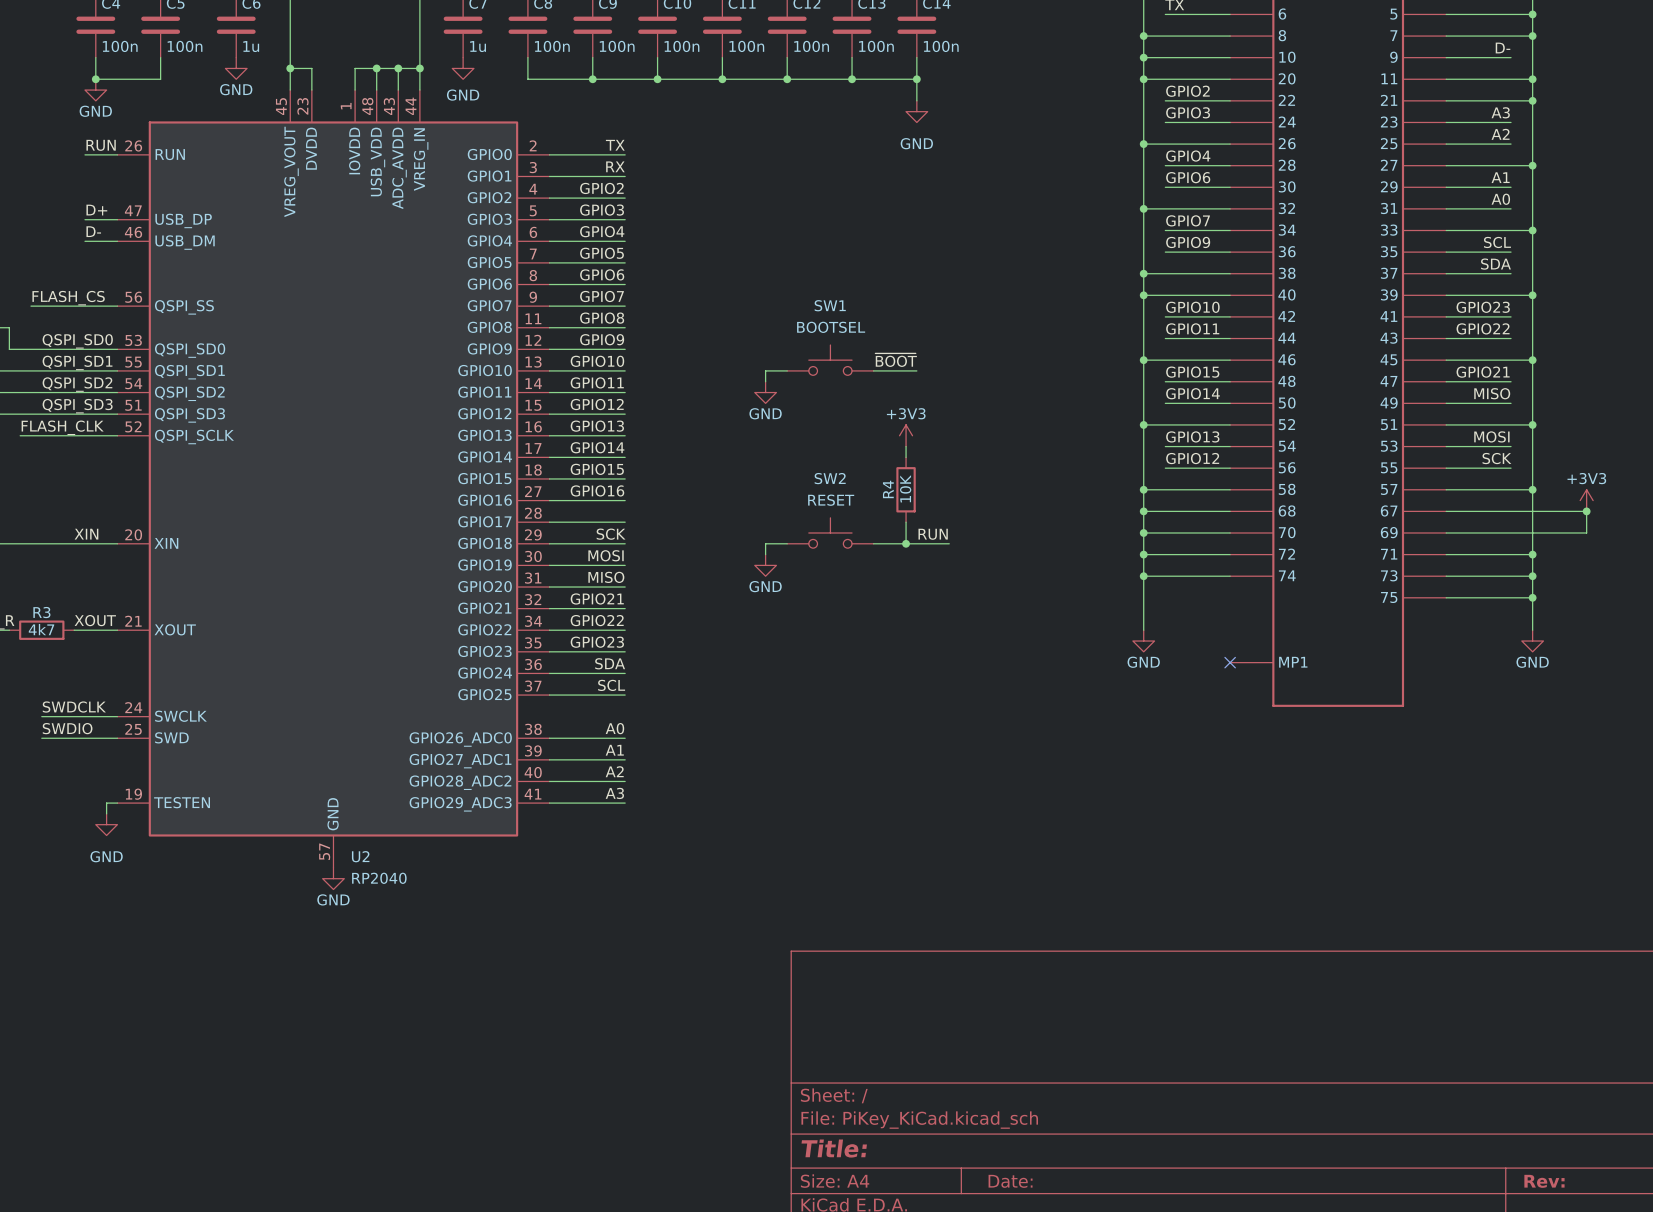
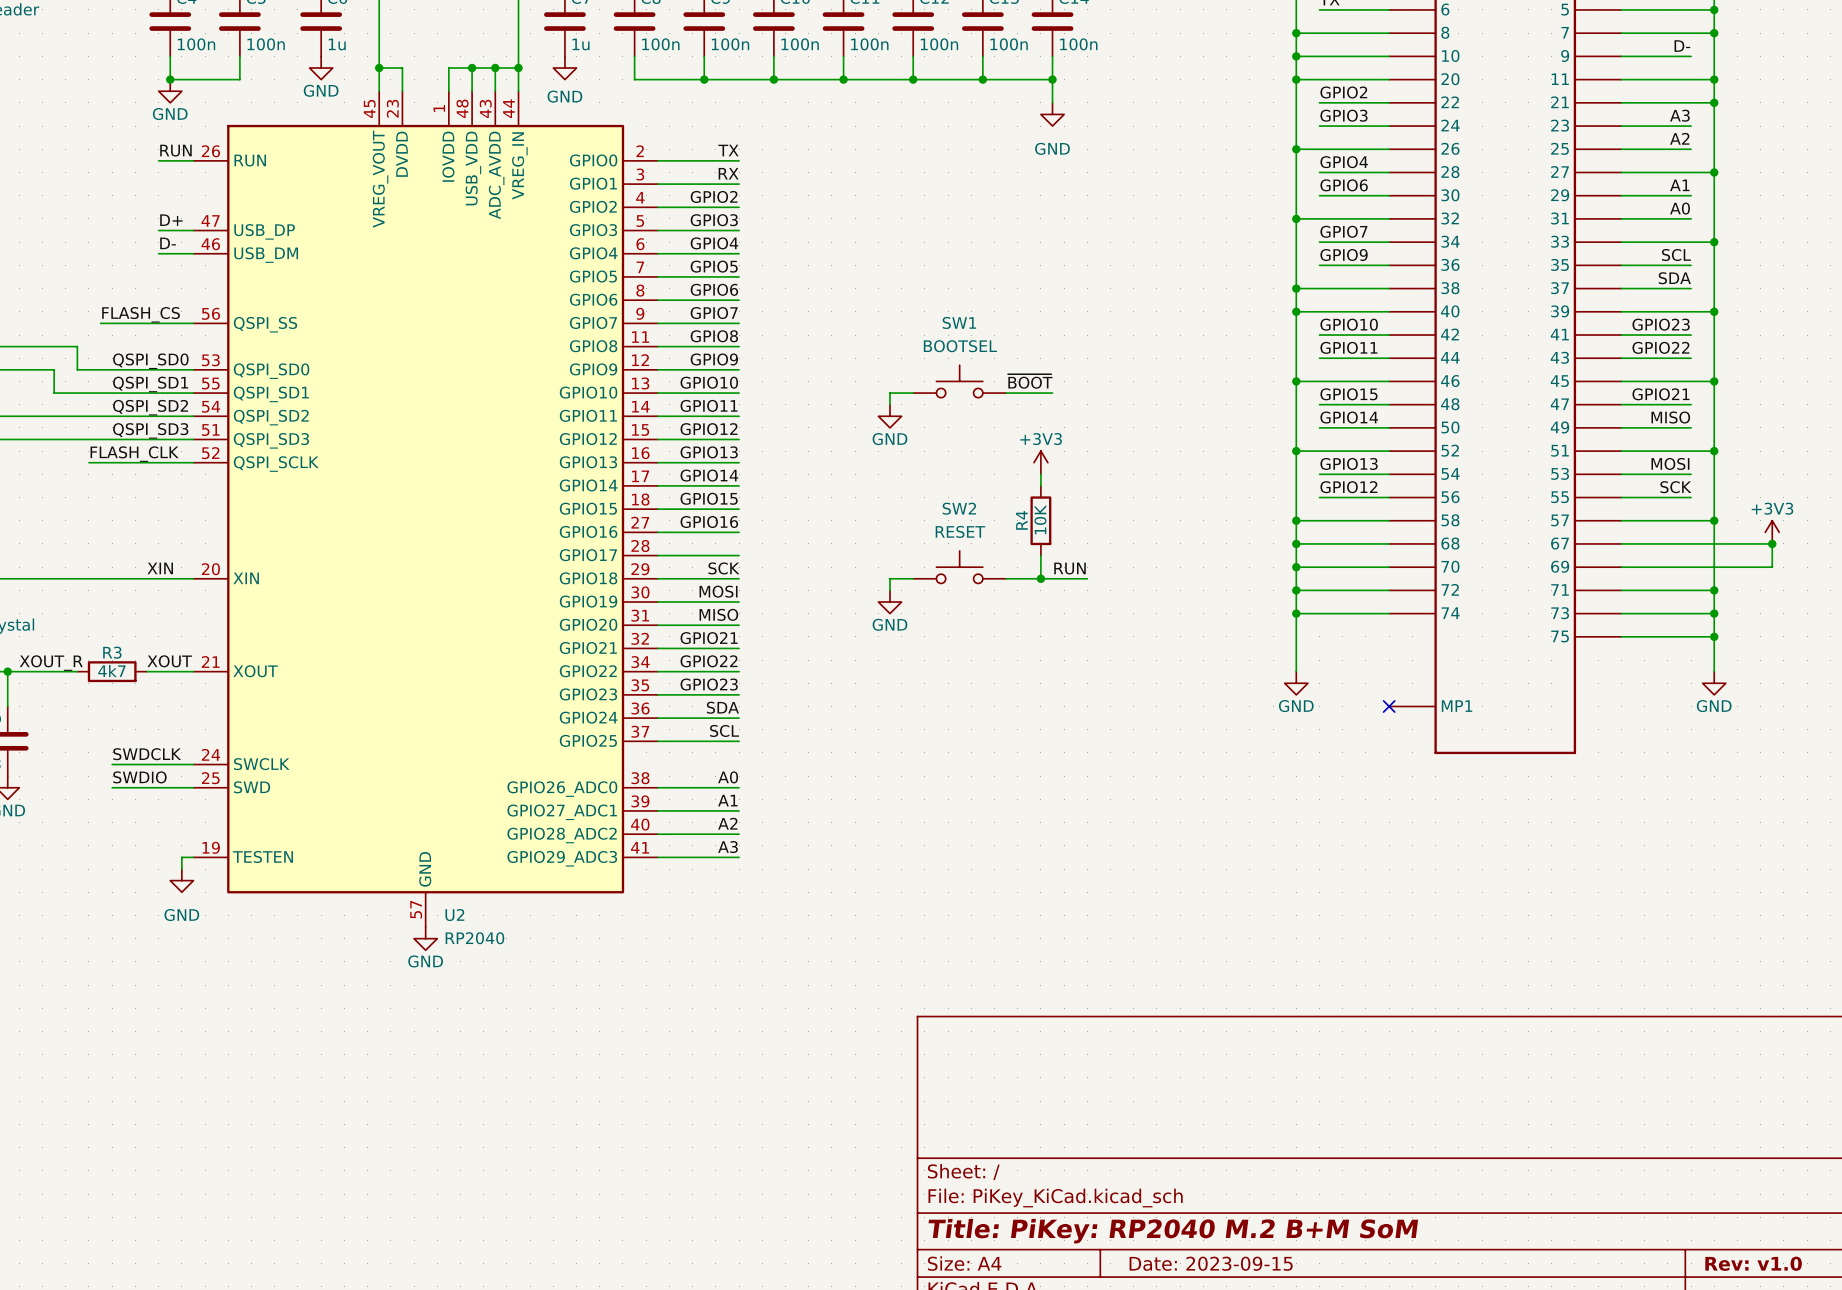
title block: Title: (834, 1148) -> Title: PiKey: RP2040 M.2 B+M SoM (1173, 1231)
title block: Date: (1010, 1181) -> Date: 2023-09-15 (1211, 1263)
title block: Rev: (1544, 1181) -> Rev: v1.0 (1753, 1263)

